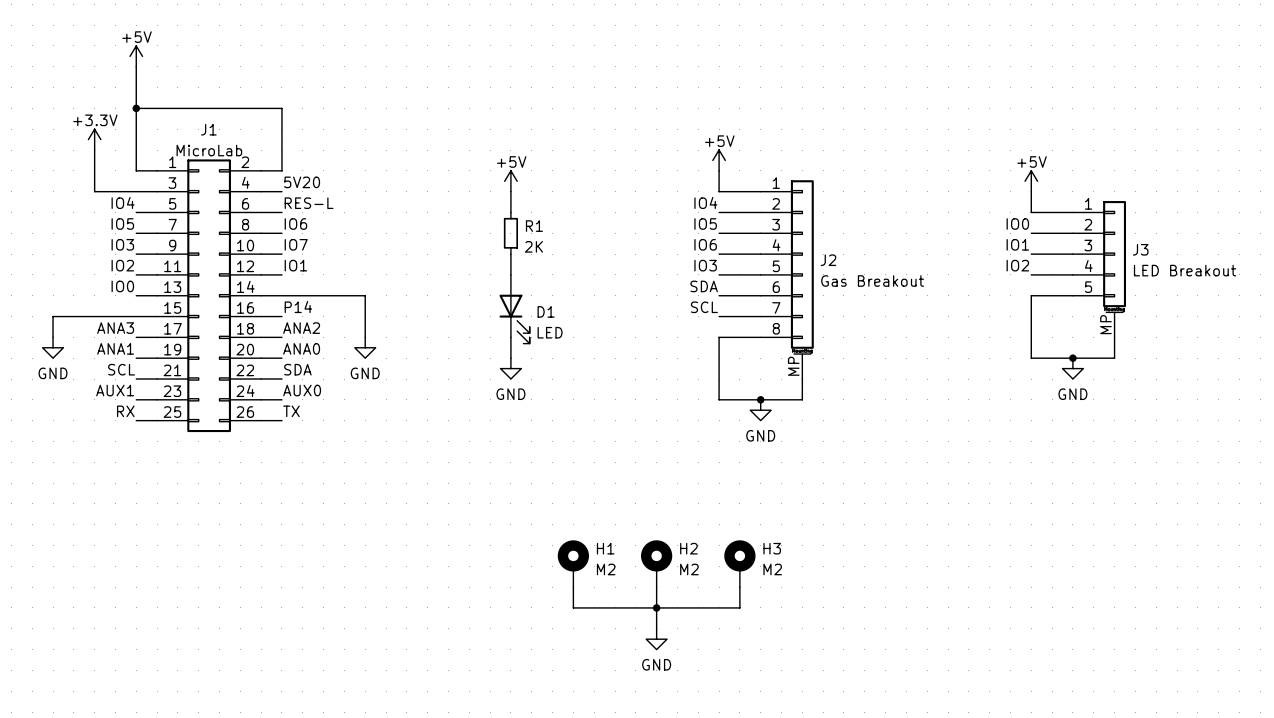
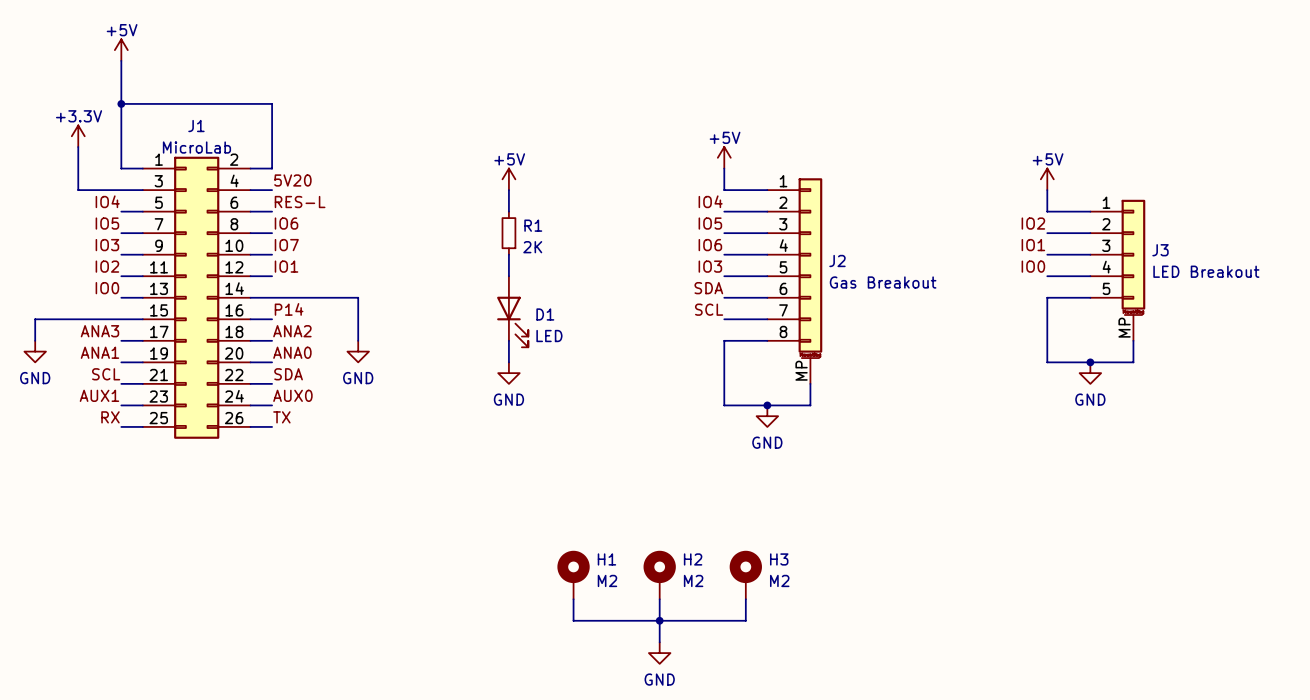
label: IO0 (1017, 224) -> IO2 (1033, 223)
label: IO2 (1017, 265) -> IO0 (1033, 266)

